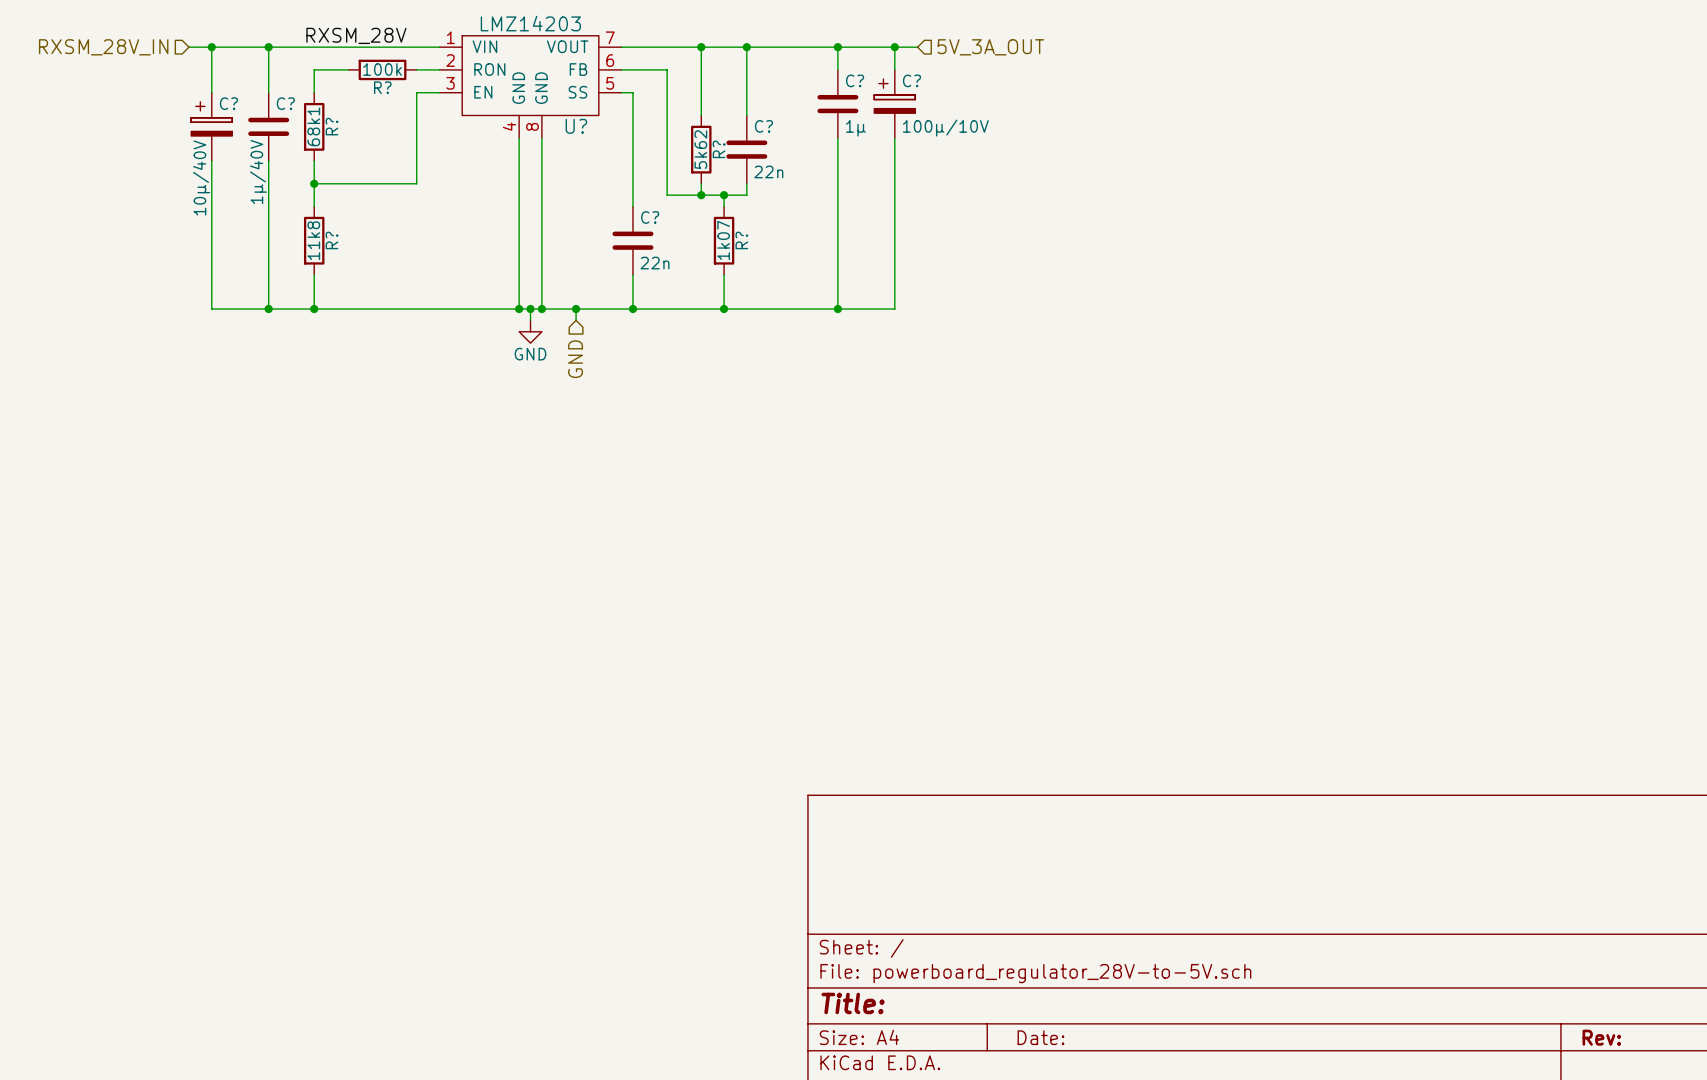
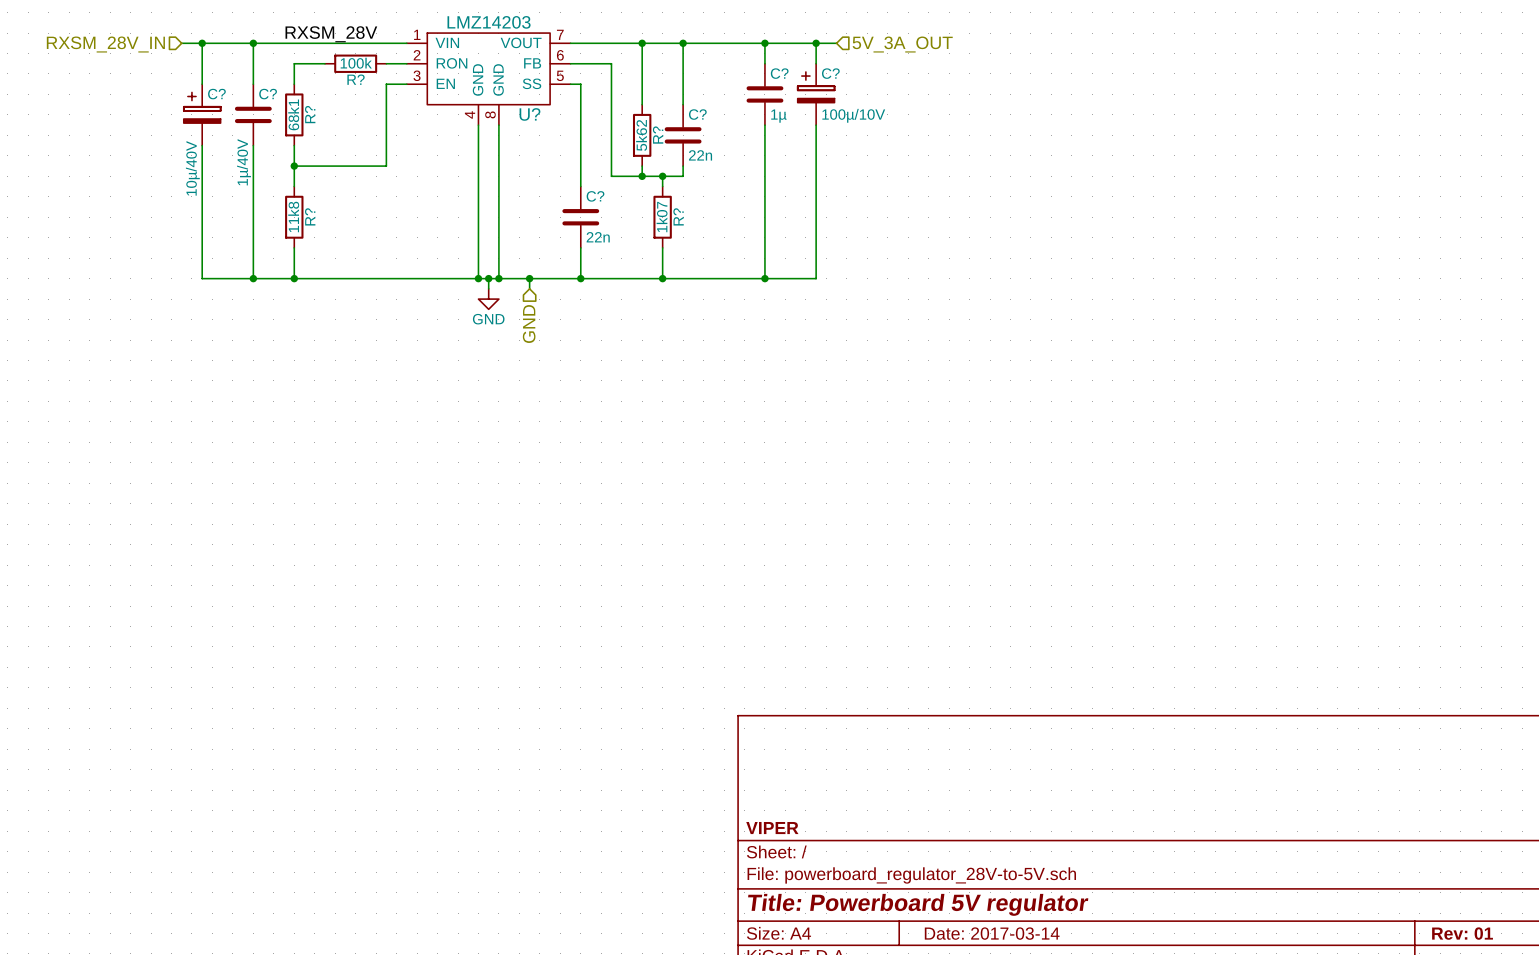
title block: none -> VIPER (772, 828)
title block: Title: (853, 1003) -> Title: Powerboard 5V regulator (918, 904)
title block: Date: (1040, 1037) -> Date: 2017-03-14 (992, 933)
title block: Rev: (1601, 1037) -> Rev: 01 (1462, 933)

